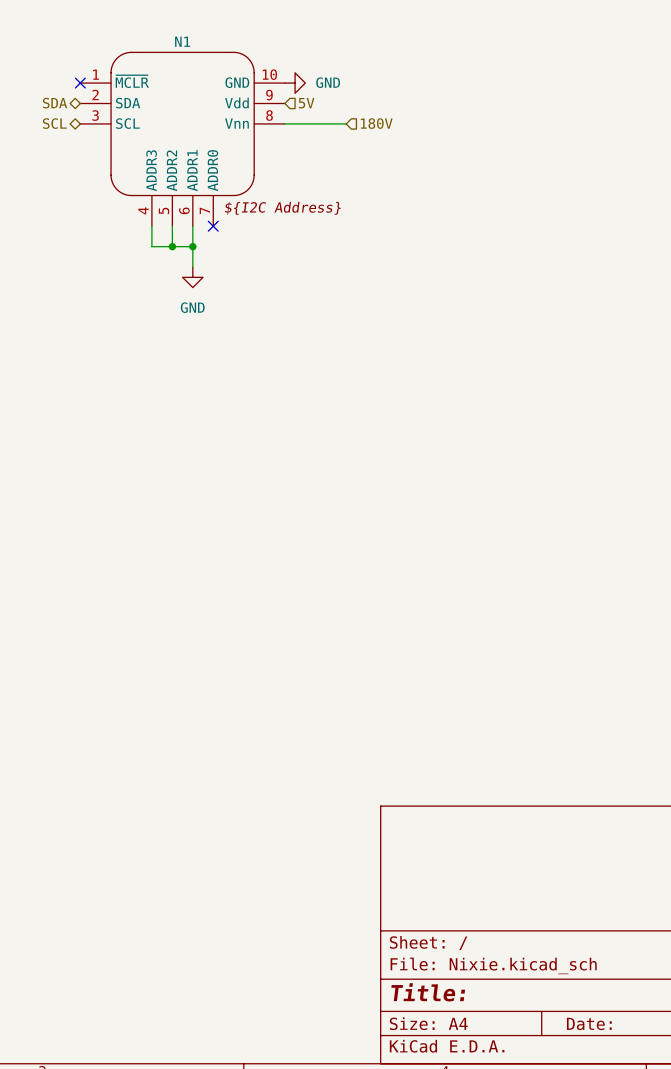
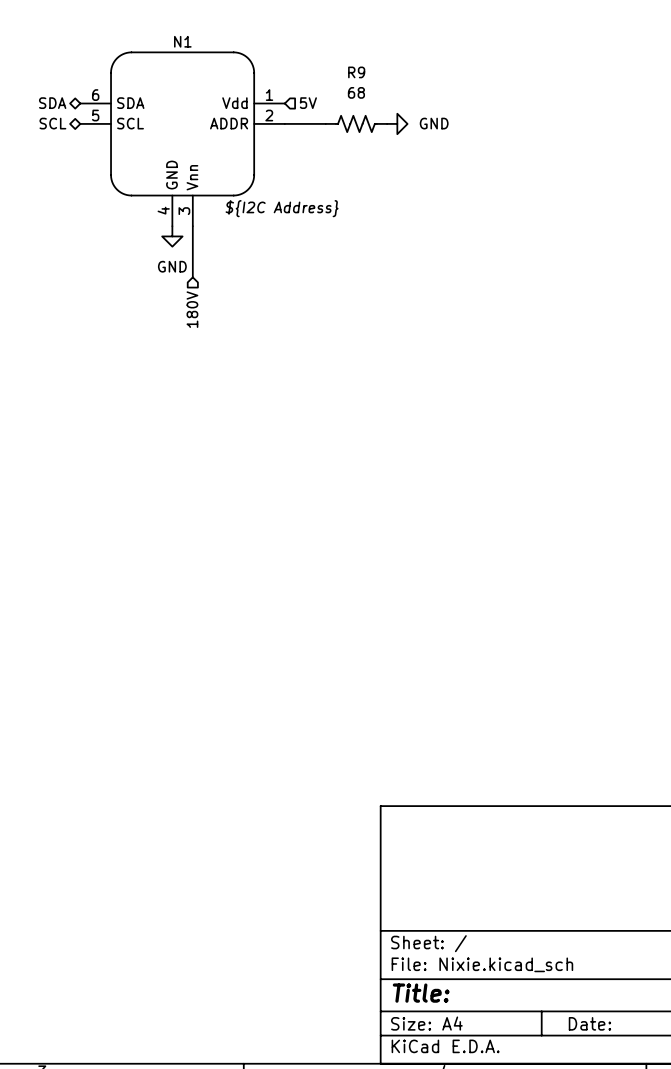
N1 symbol: [80, 52, 285, 227] -> [80, 52, 285, 227]
no-connect mark: (80, 83) -> none
power symbol: GND (295, 83) -> none
R9: none -> 68 (356, 123)
hierarchical label: 180V (376, 123) -> none
power symbol: none -> GND (397, 123)
wire: (151, 226) (151, 246) (192, 246) -> none
no-connect mark: (213, 226) -> none
junction: (172, 246) -> none
junction: (192, 246) -> none
power symbol position: GND (192, 277) -> GND (172, 236)
hierarchical label: none -> 180V (192, 309)

